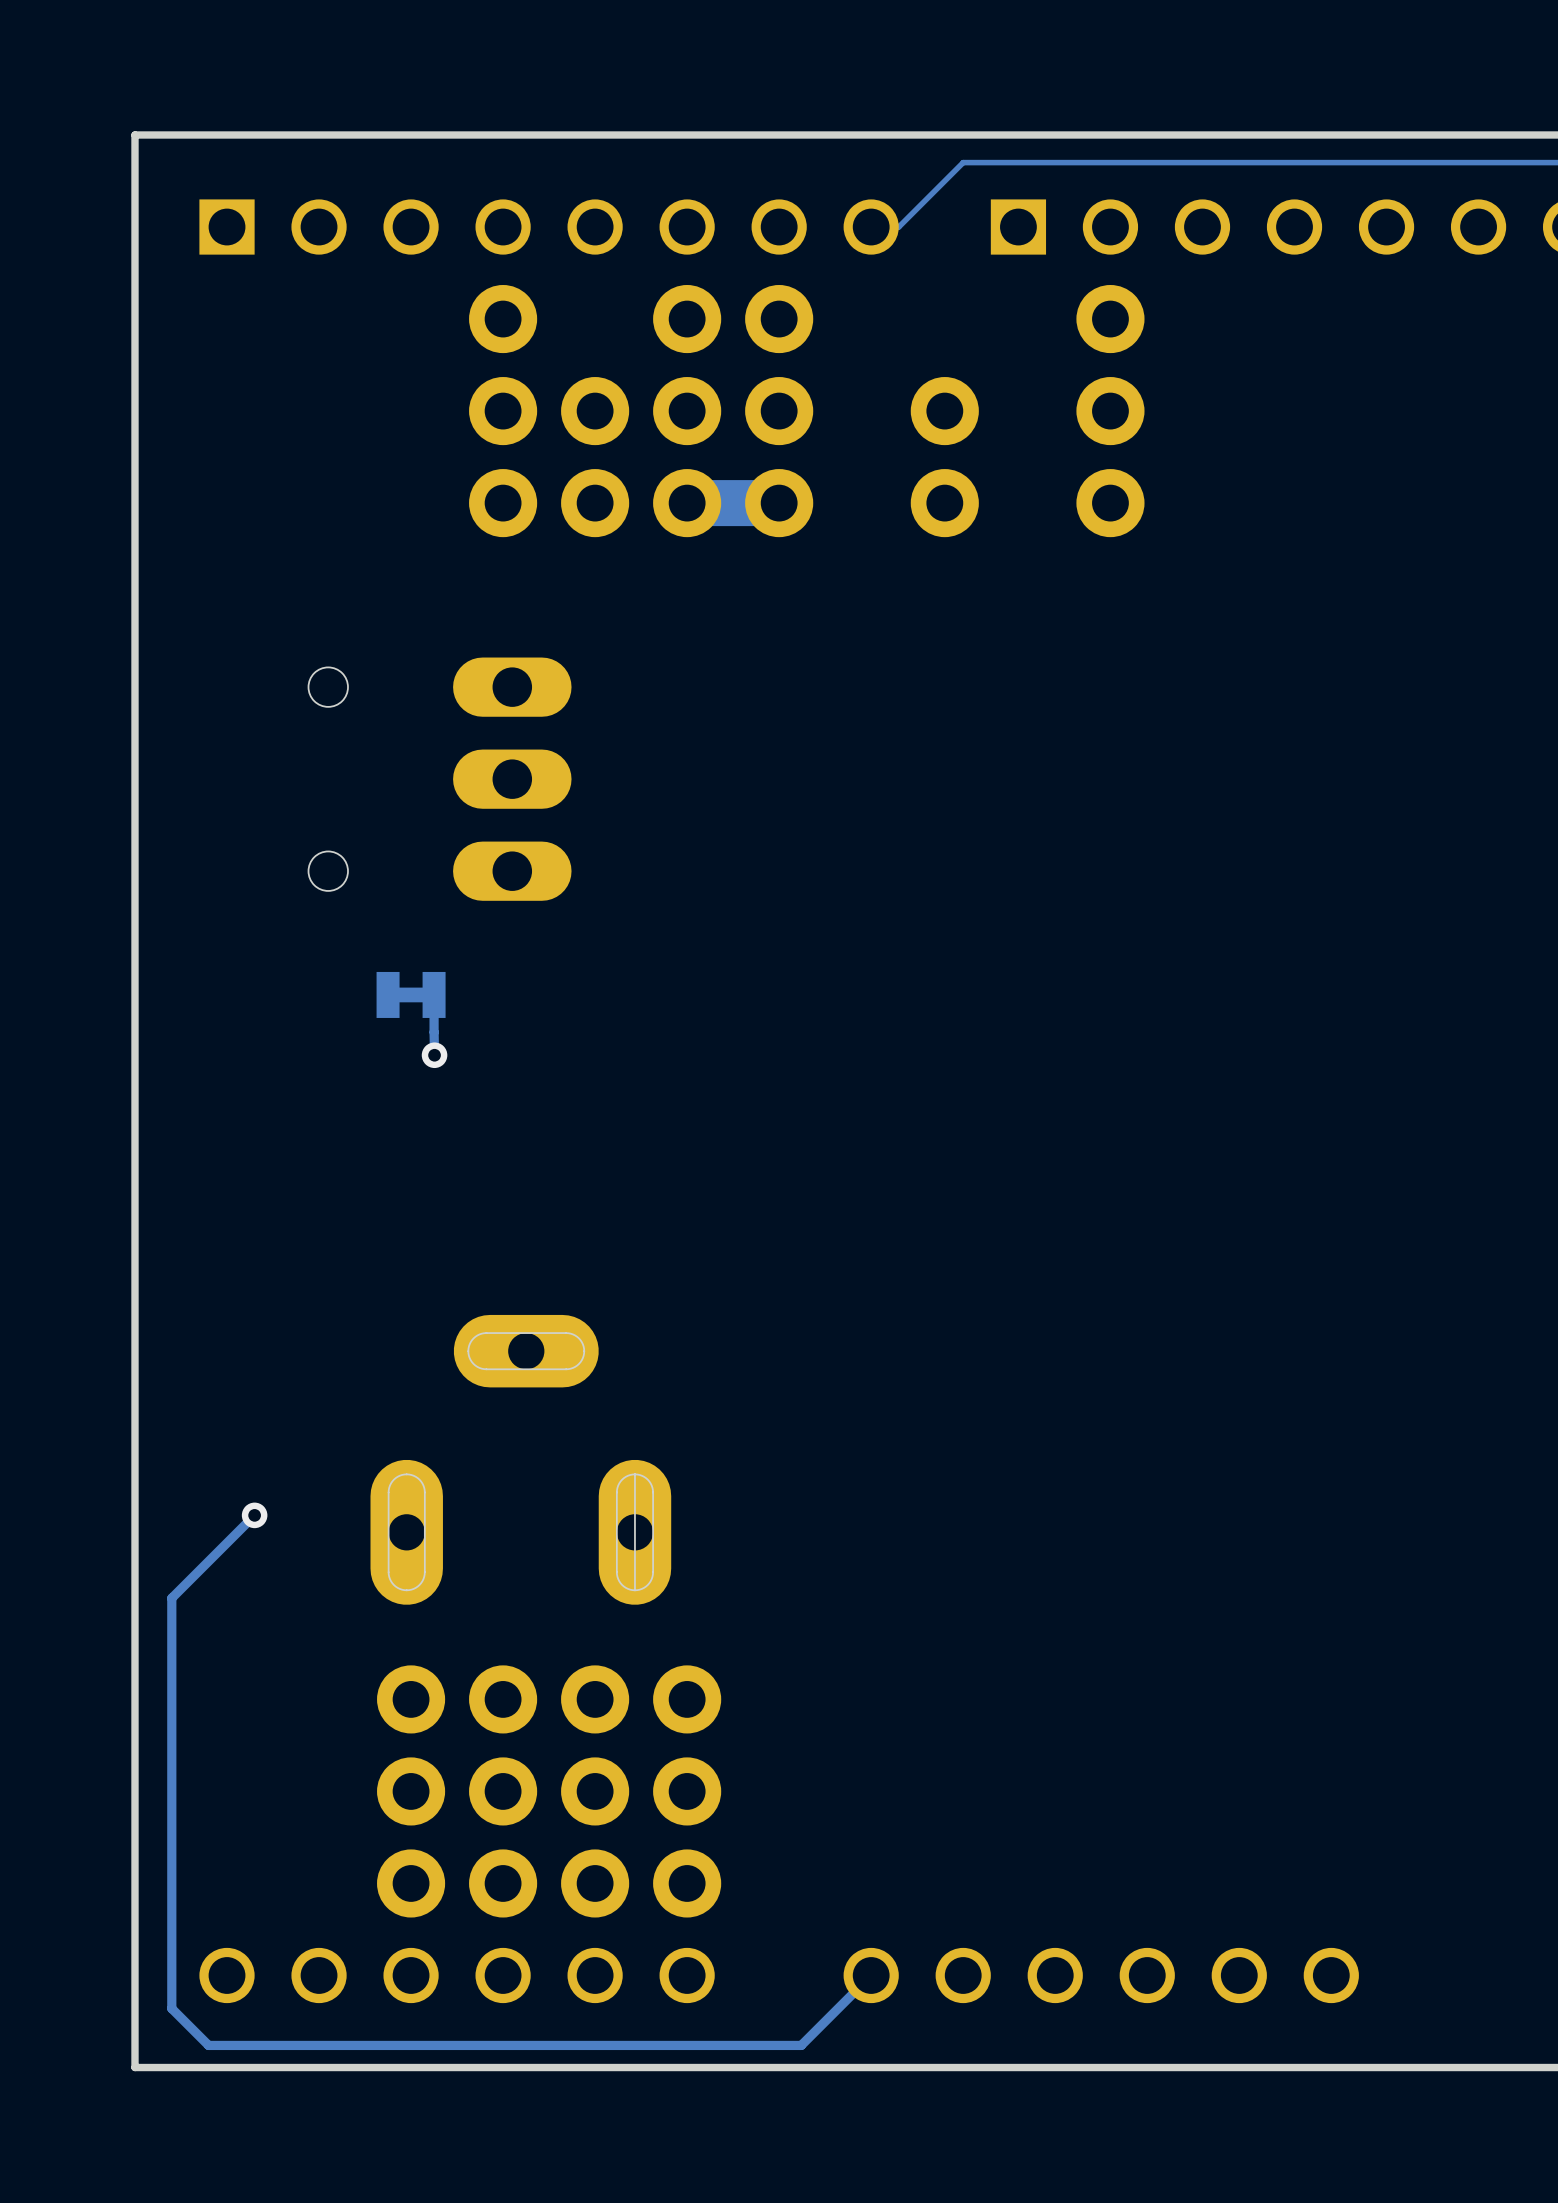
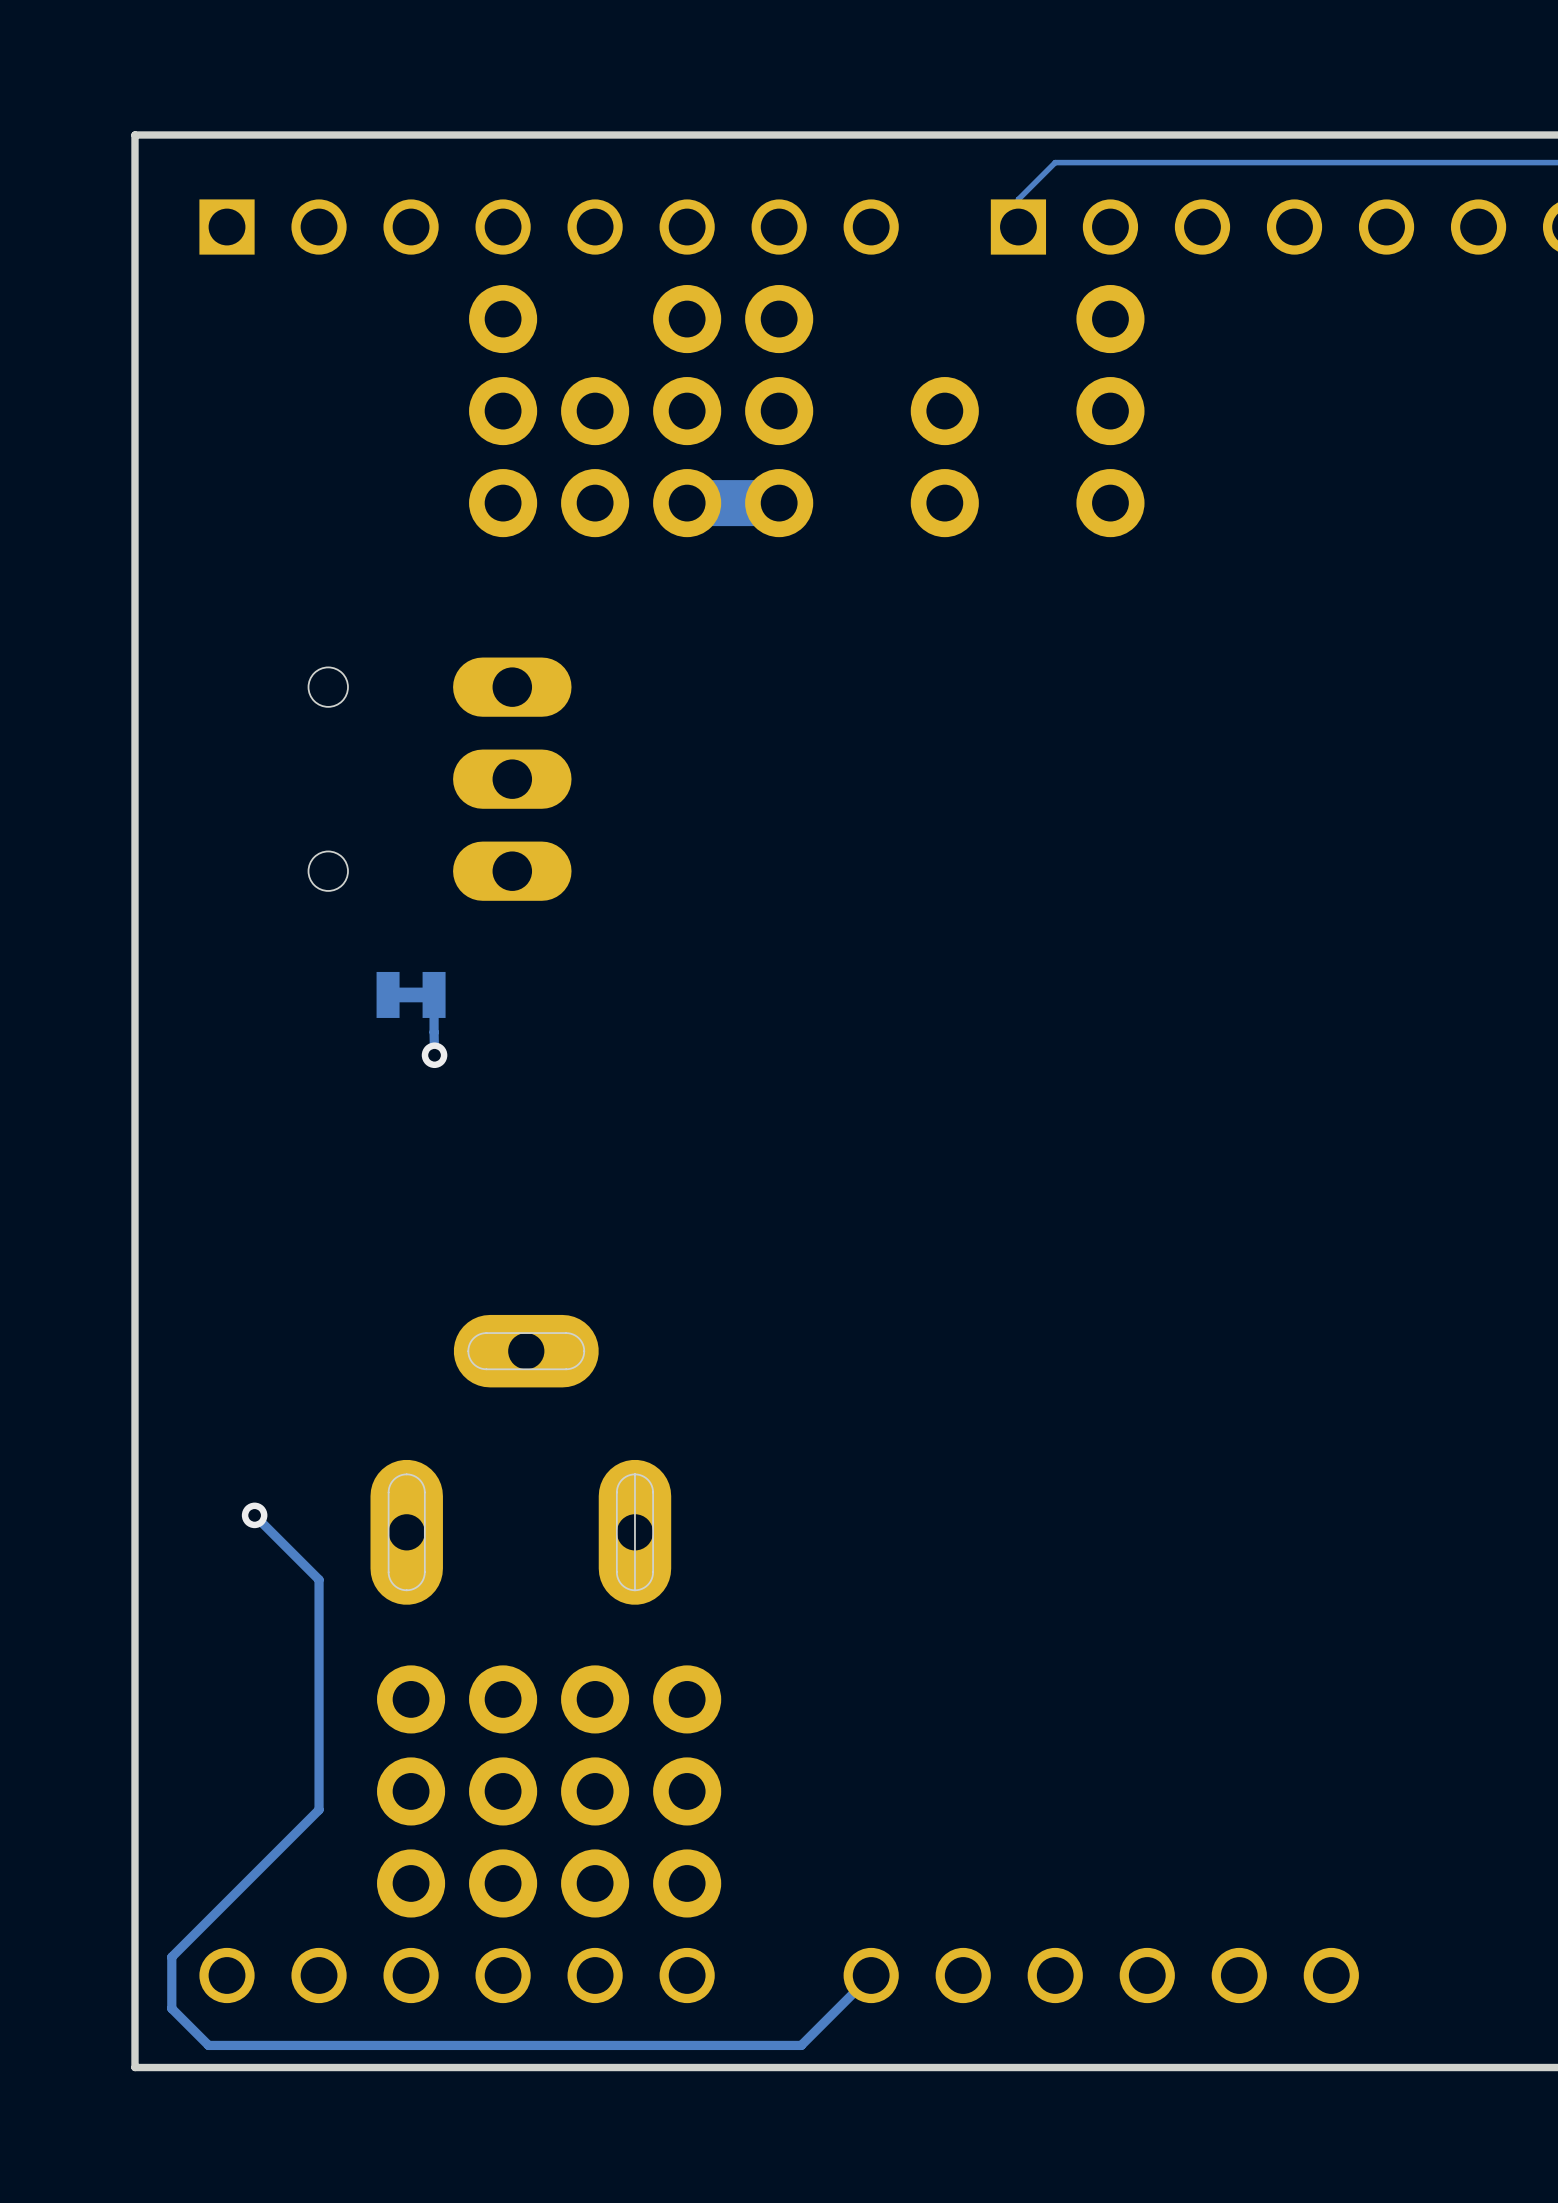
track: (1055, 162) (963, 162) (898, 227) (871, 227) -> (1055, 162) (1018, 199) (1018, 227)
track: (254, 1515) (171, 1598) (171, 1957) -> (254, 1515) (319, 1579) (319, 1809) (171, 1957)

